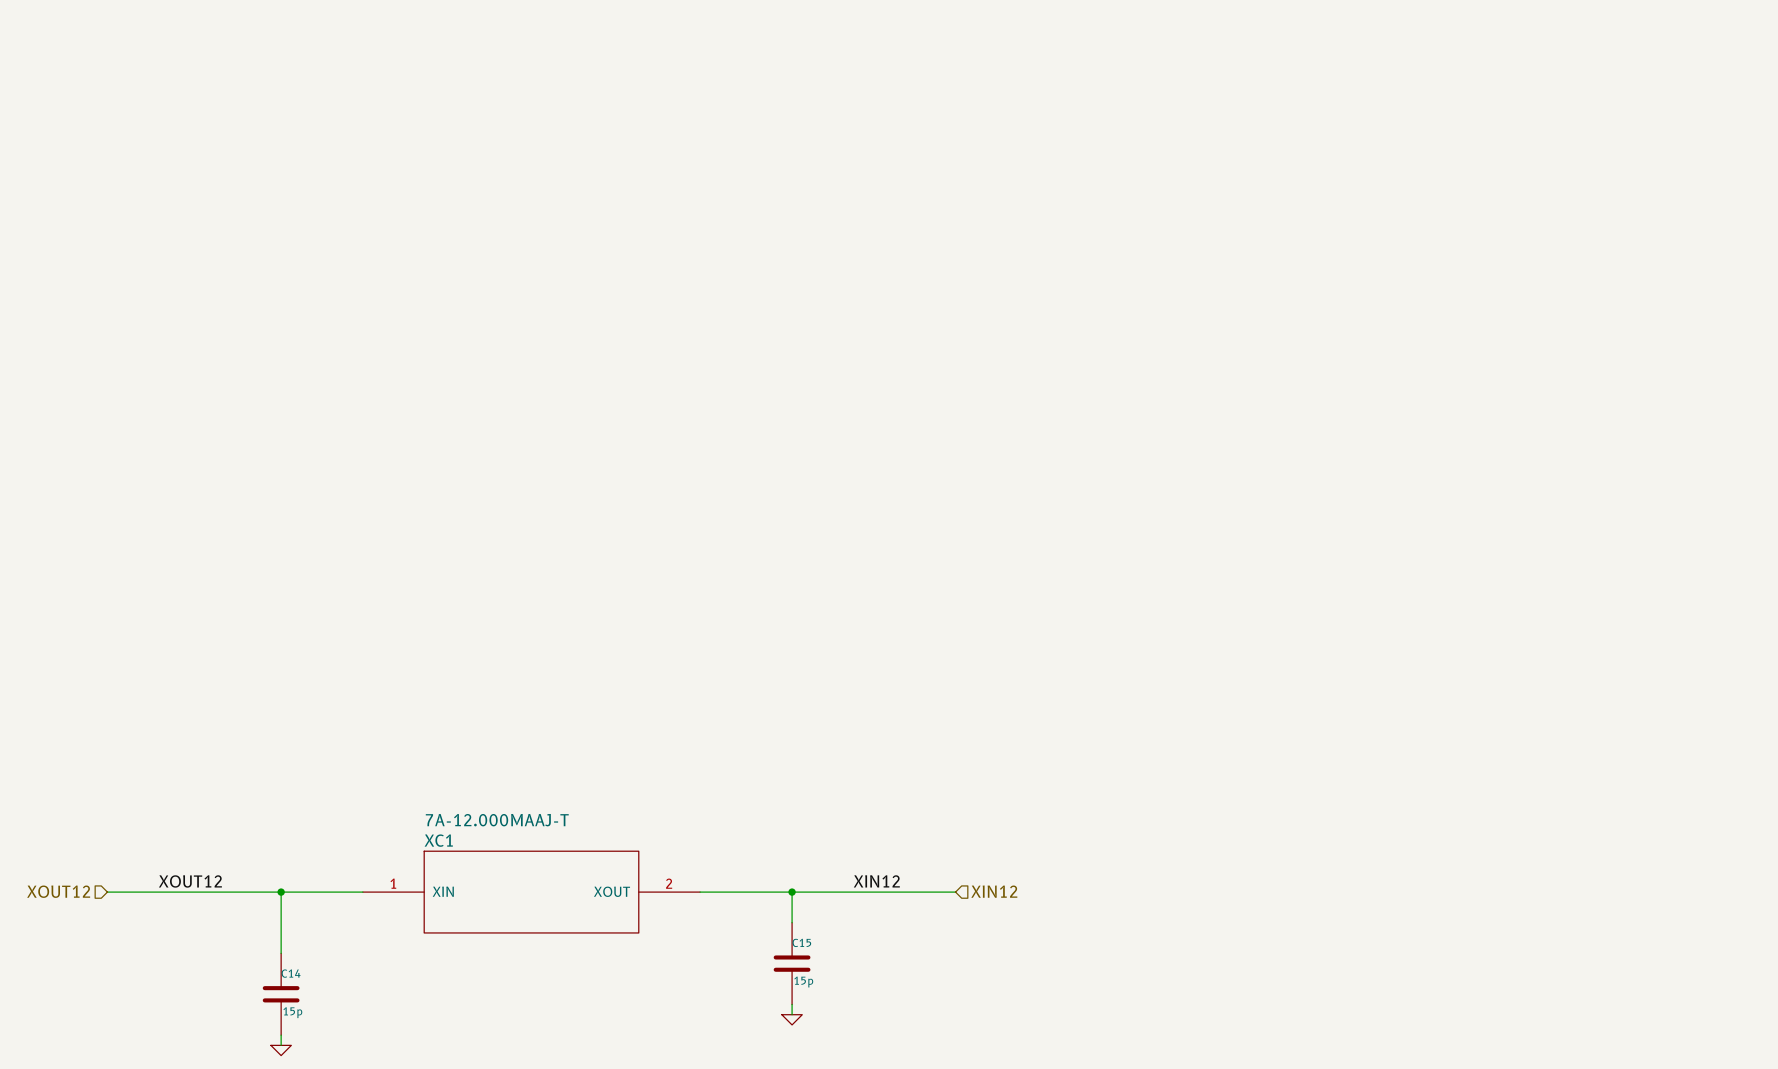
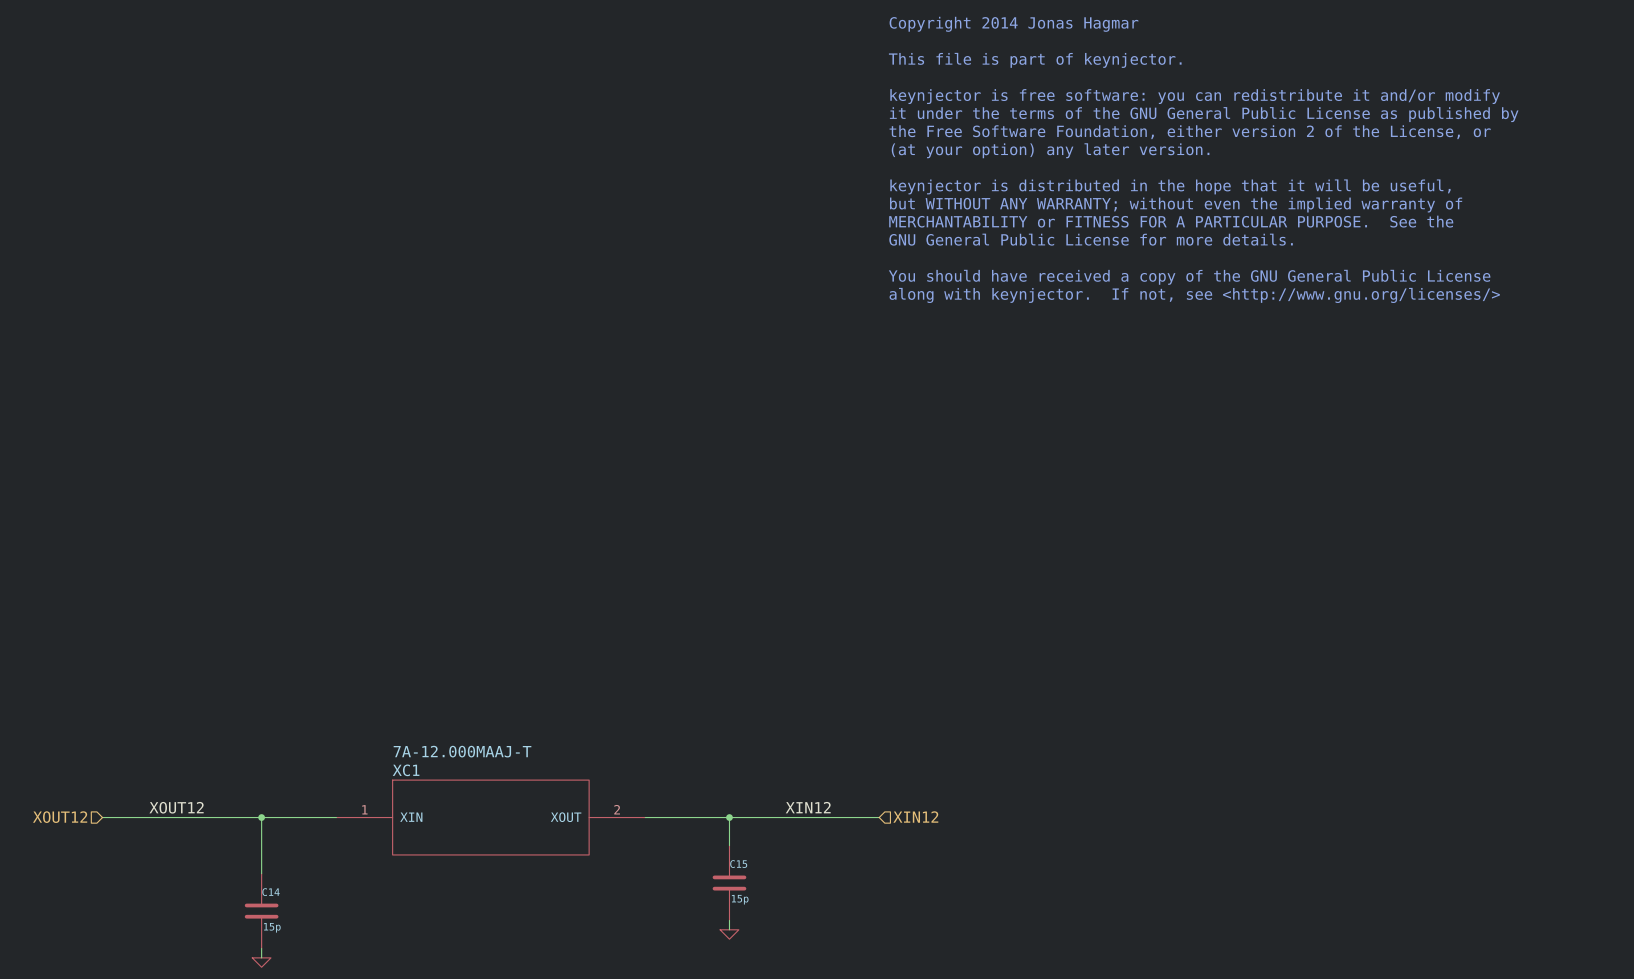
text: none -> Copyright 2014 Jonas Hagmar (1013, 24)
text: none -> This file is part of keynjector. (1035, 60)
text: none -> keynjector is free software: you can redistribute it and/or modify (1195, 96)
text: none -> it under the terms of the GNU General Public License as published by (1204, 114)
text: none -> the Free Software Foundation, either version 2 of the License, or (1190, 132)
text: none -> (at your option) any later version. (1050, 150)
text: none -> keynjector is distributed in the hope that it will be useful, (1170, 186)
text: none -> but WITHOUT ANY WARRANTY; without even the implied warranty of (1176, 204)
text: none -> MERCHANTABILITY or FITNESS FOR A PARTICULAR PURPOSE. See the (1171, 221)
text: none -> GNU General Public License for more details. (1091, 239)
text: none -> You should have received a copy of the GNU General Public License (1189, 277)
text: none -> along with keynjector. If not, see <http://www.gnu.org/licenses/> (1194, 295)

